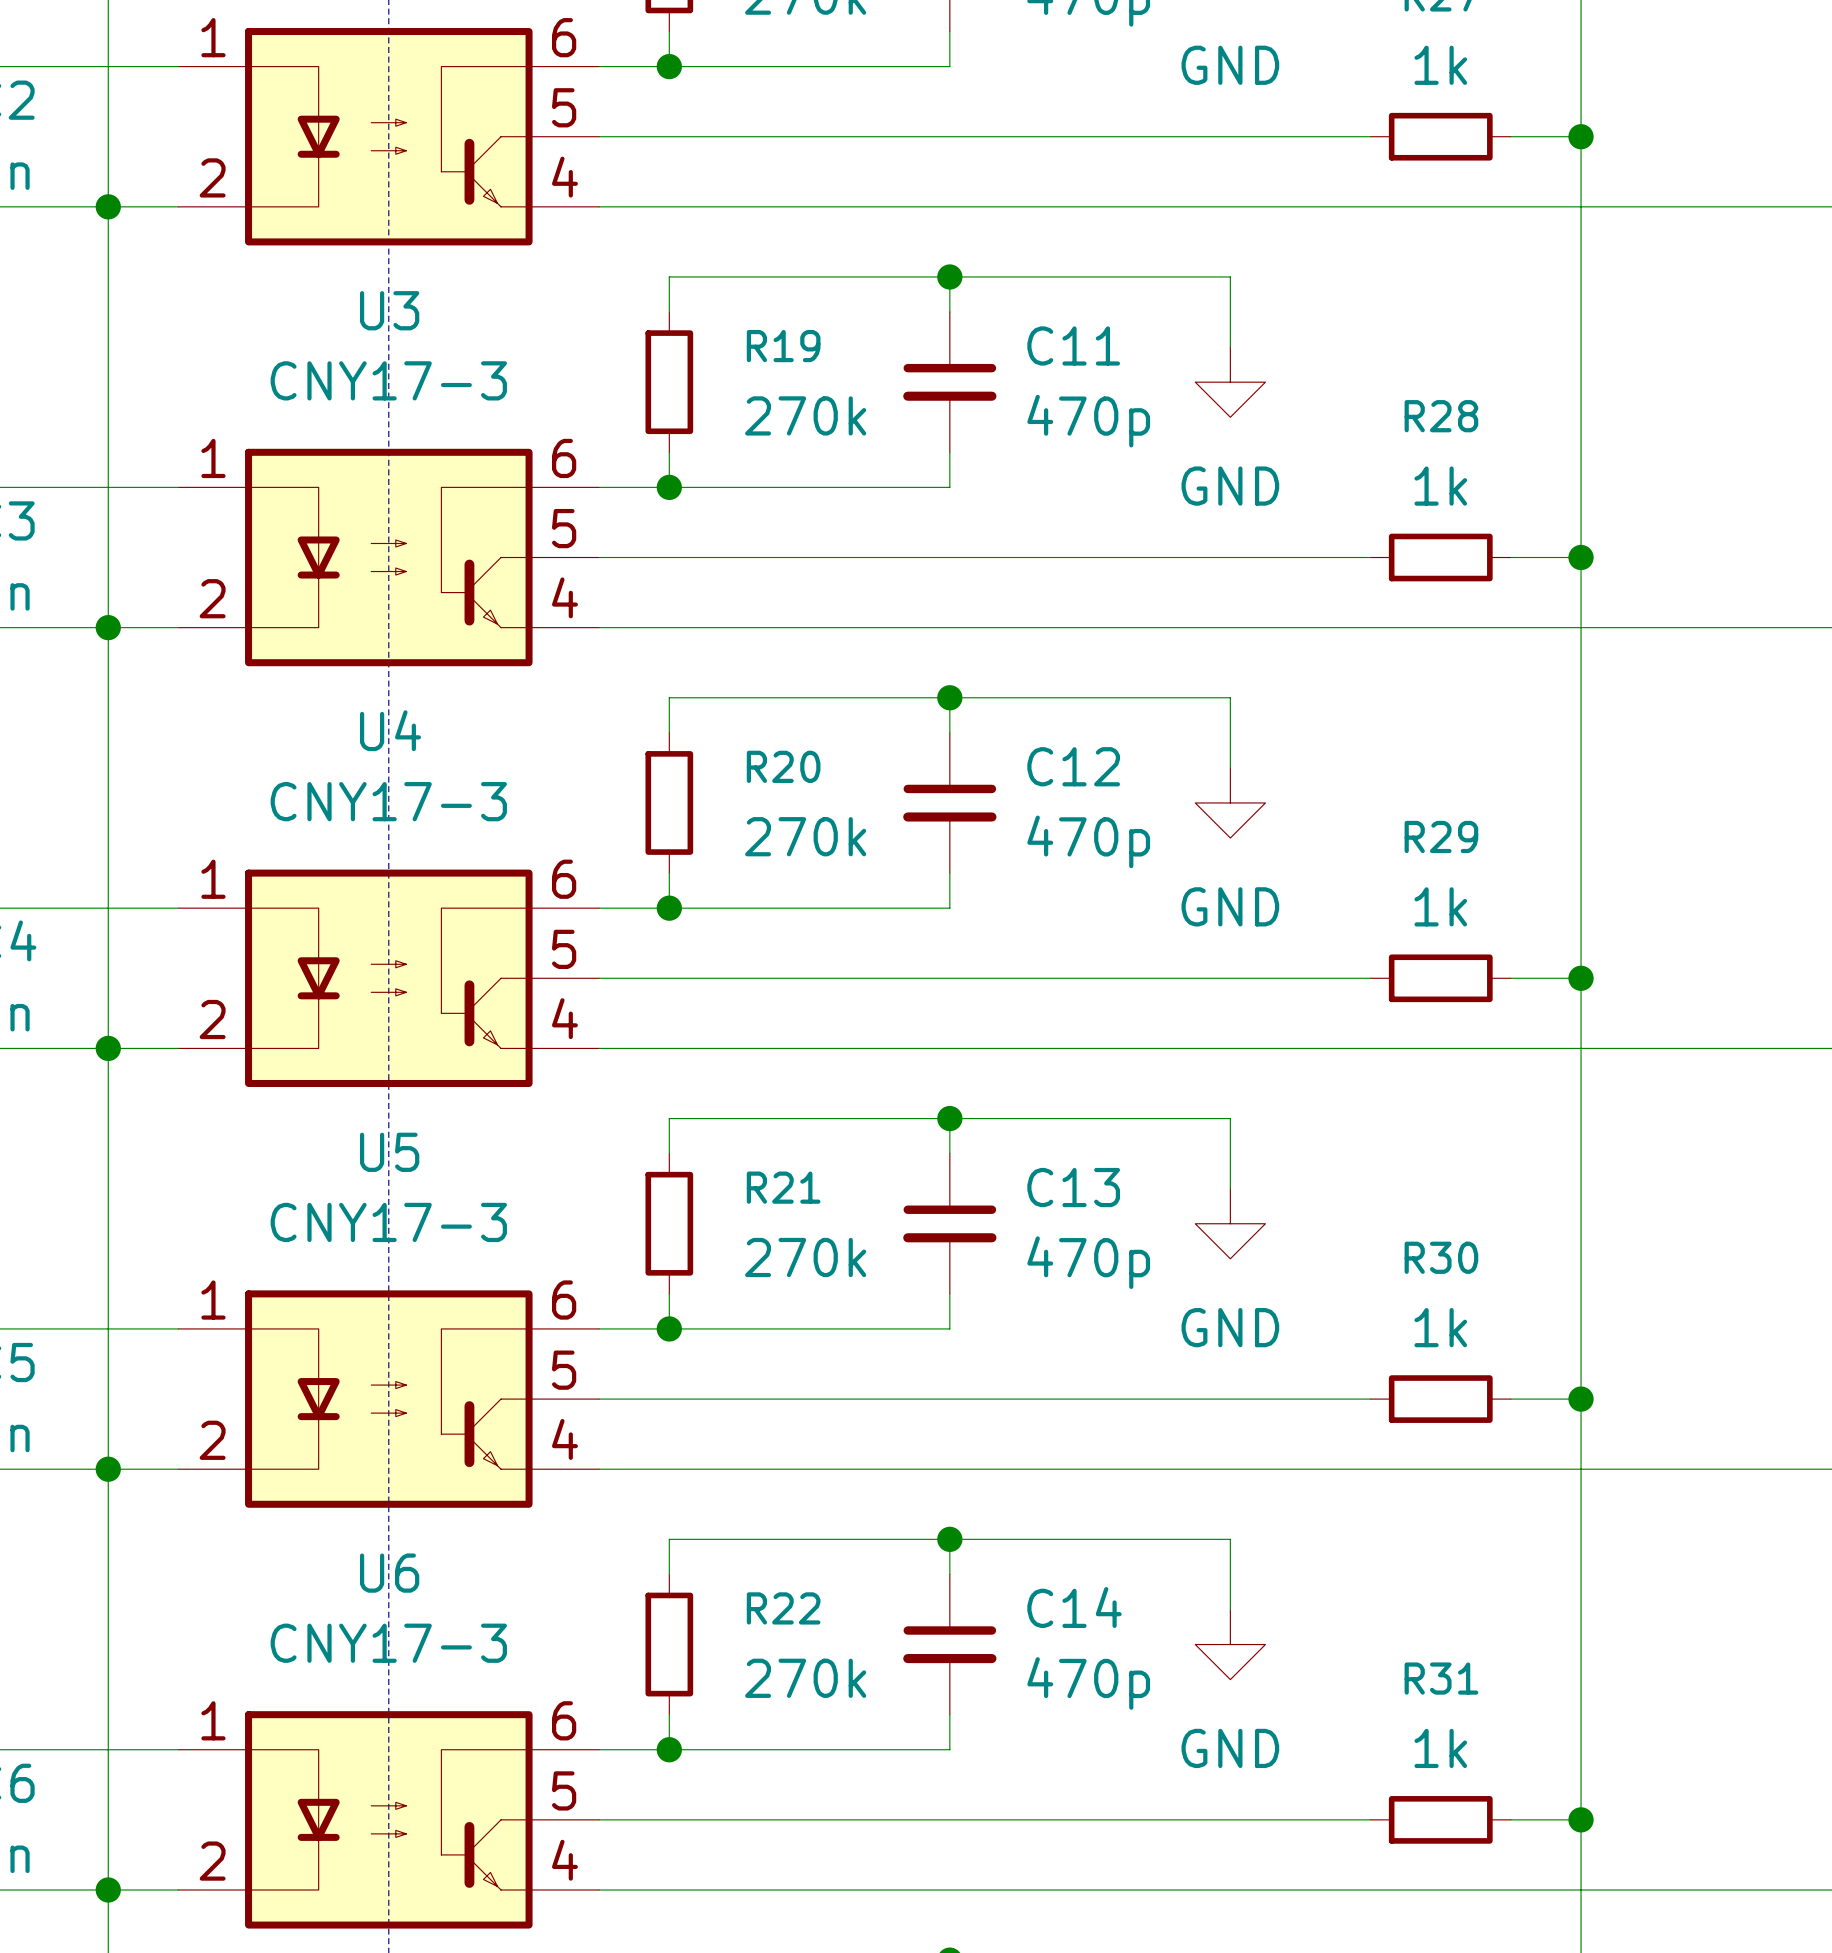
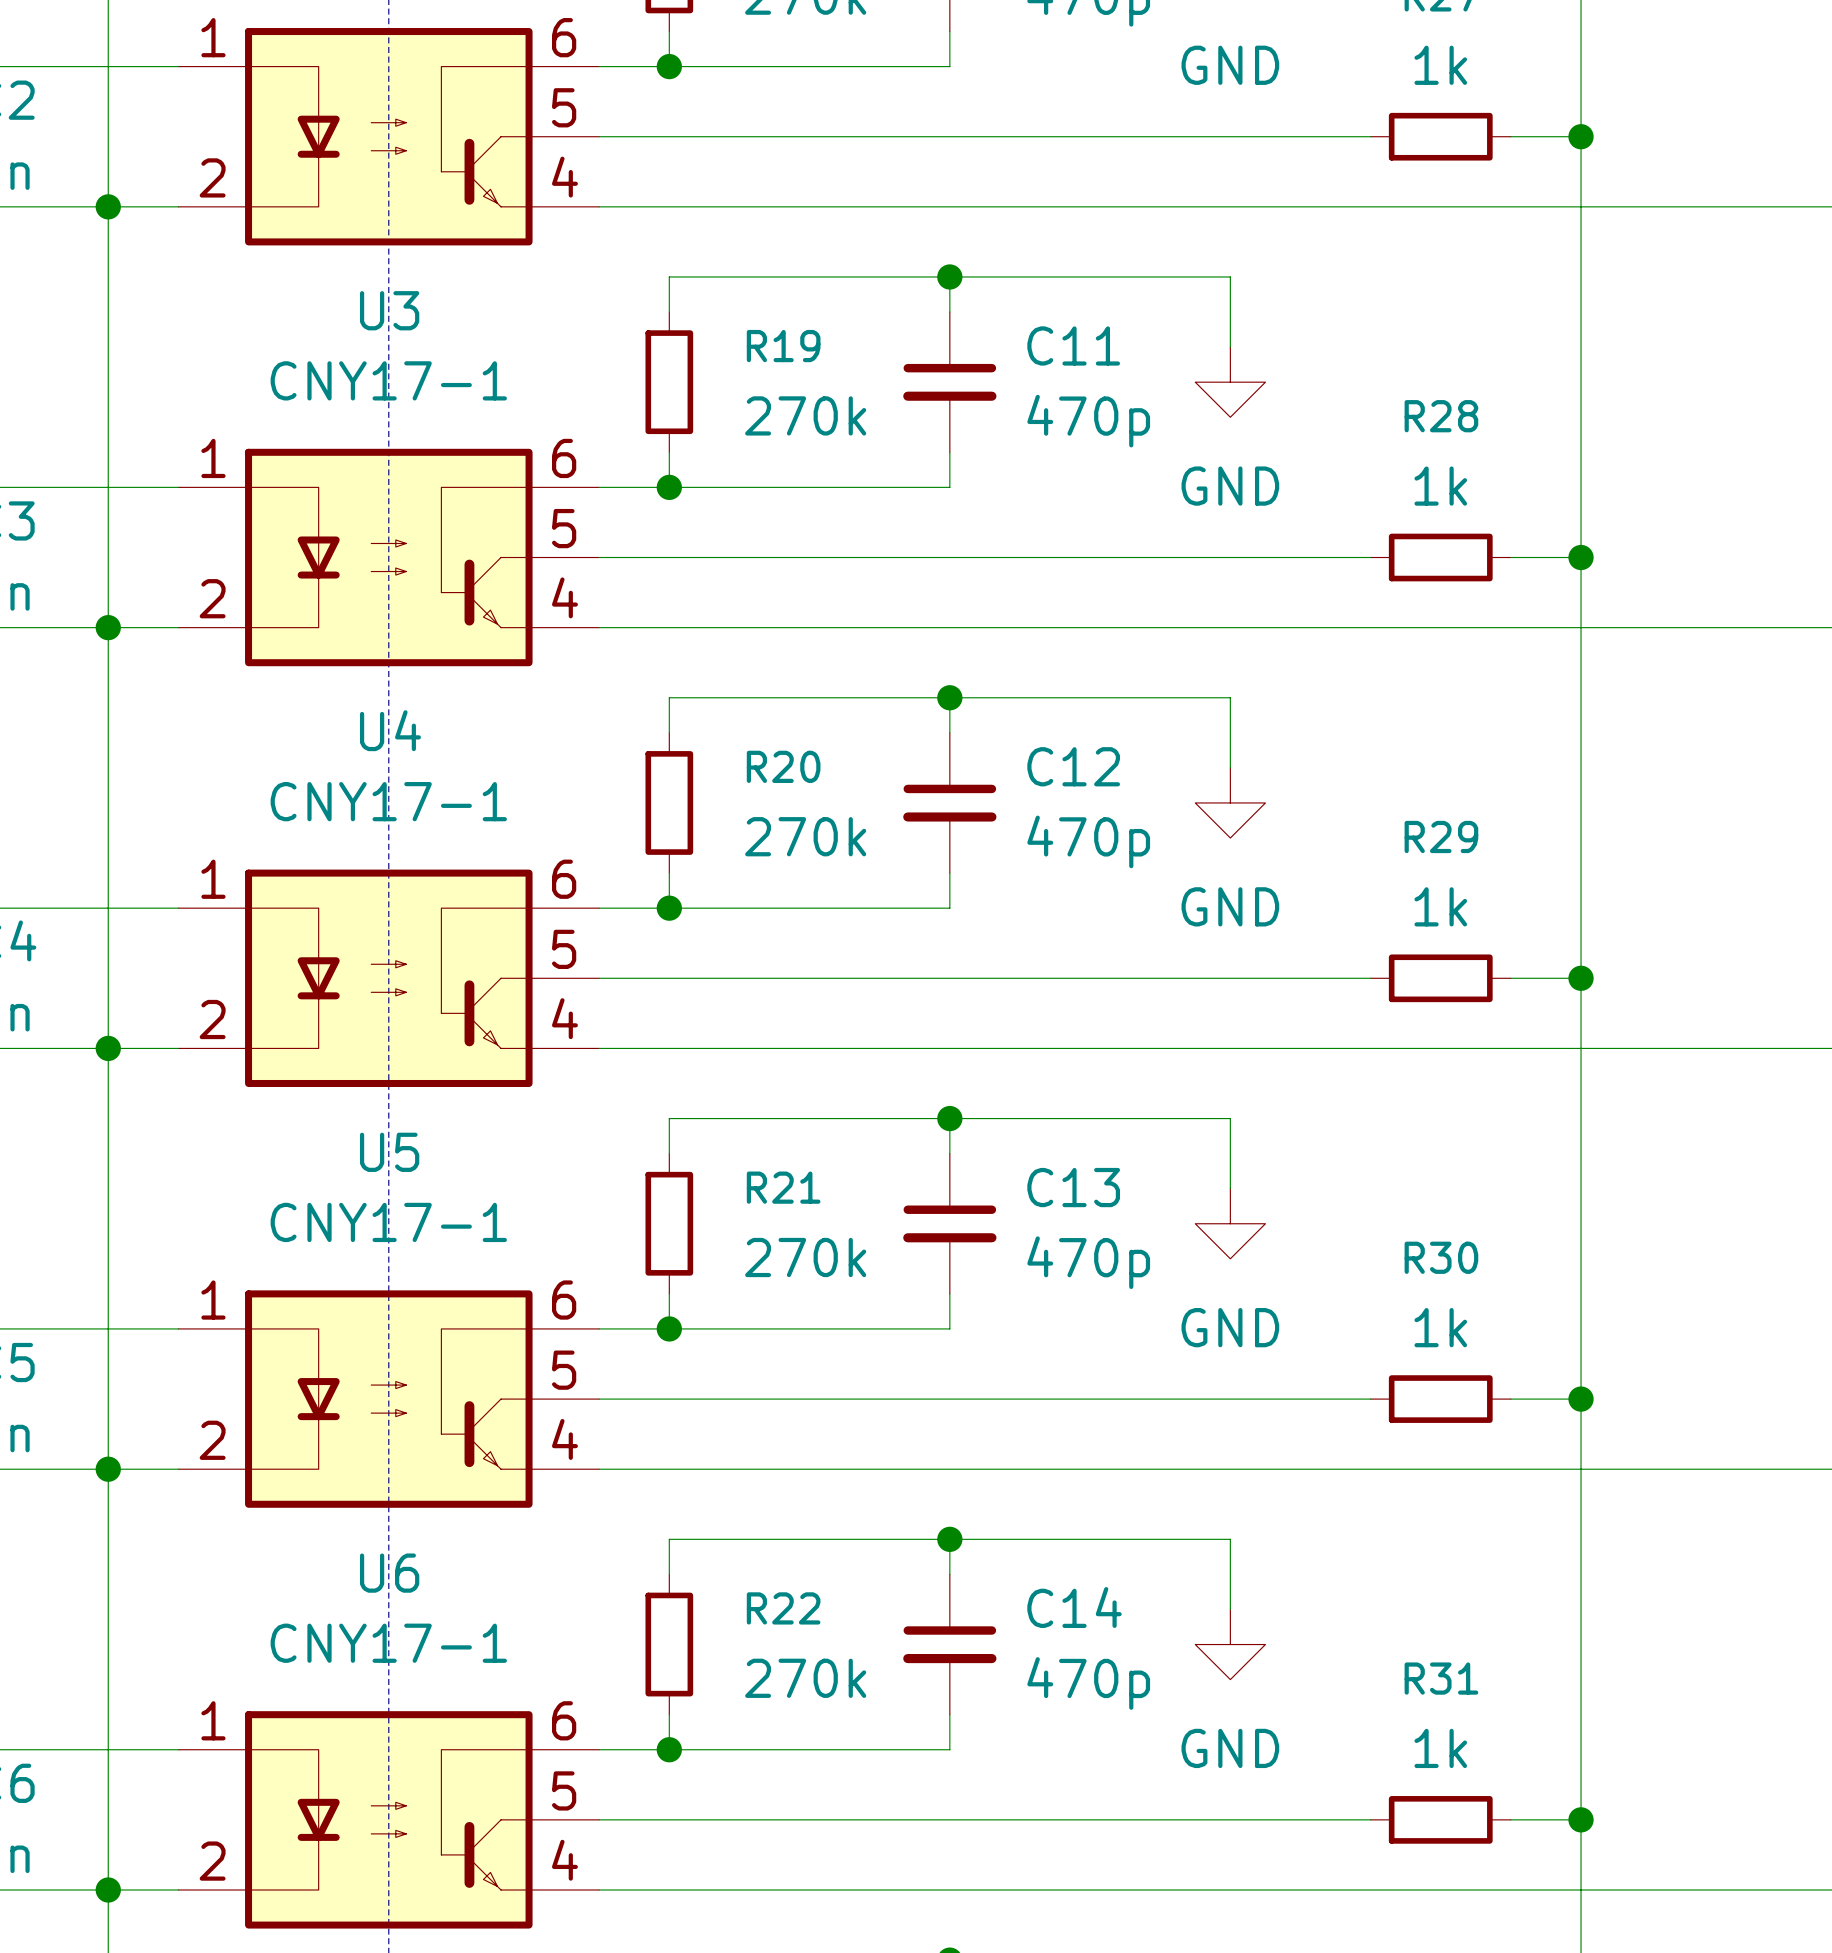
U3 value: CNY17-3 (388, 380) -> CNY17-1 (388, 380)
U4 value: CNY17-3 (388, 801) -> CNY17-1 (388, 801)
U5 value: CNY17-3 (388, 1222) -> CNY17-1 (388, 1222)
U6 value: CNY17-3 (388, 1643) -> CNY17-1 (388, 1643)

